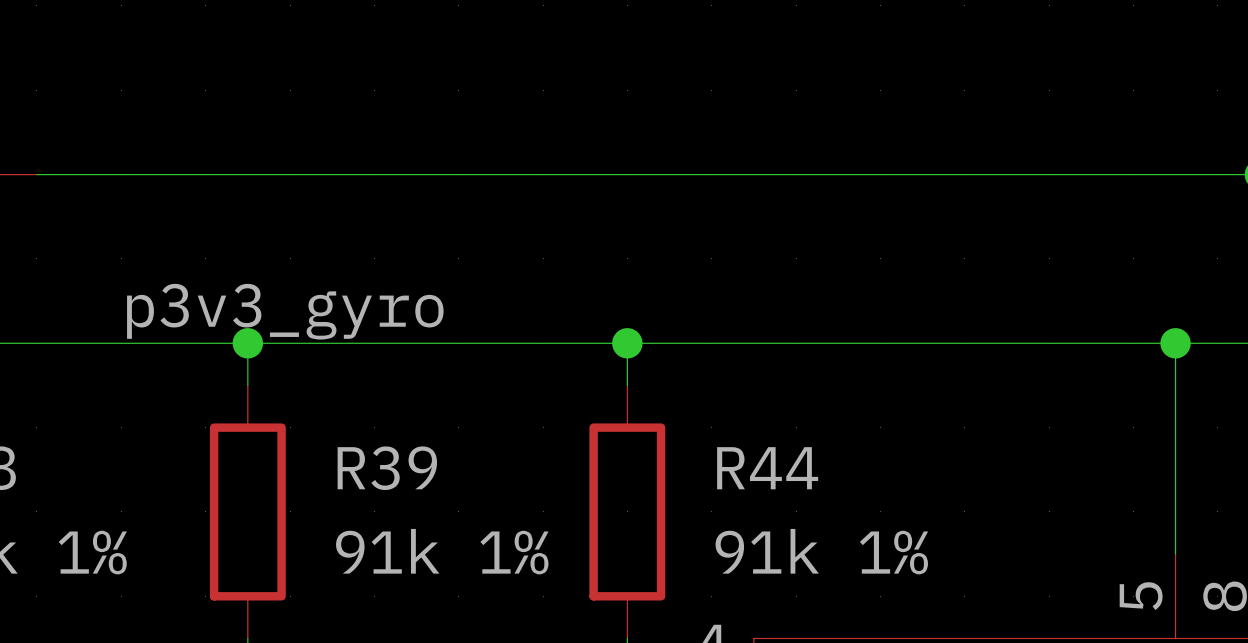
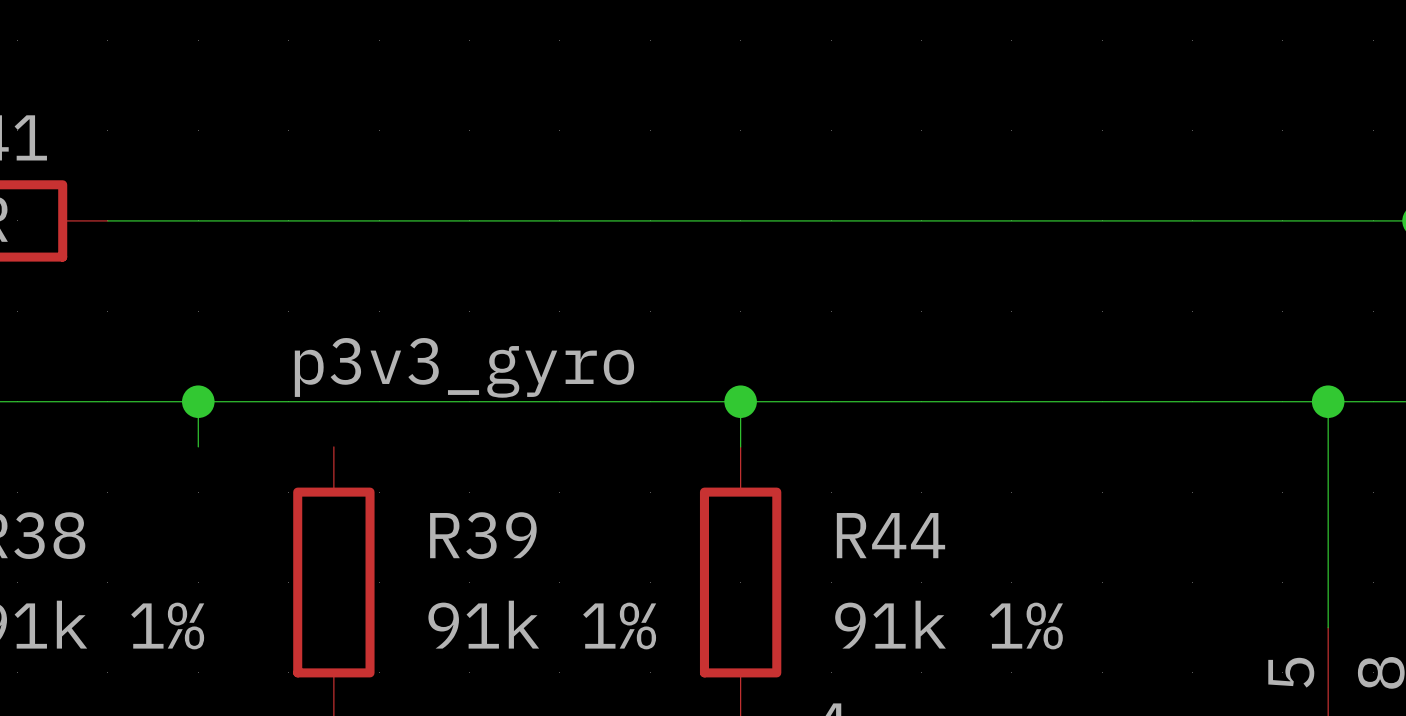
label position: p3v3_gyro (285, 311) -> p3v3_gyro (464, 367)
wire: (247, 343) (247, 385) -> (198, 401) (198, 446)
junction position: (247, 343) -> (198, 401)

